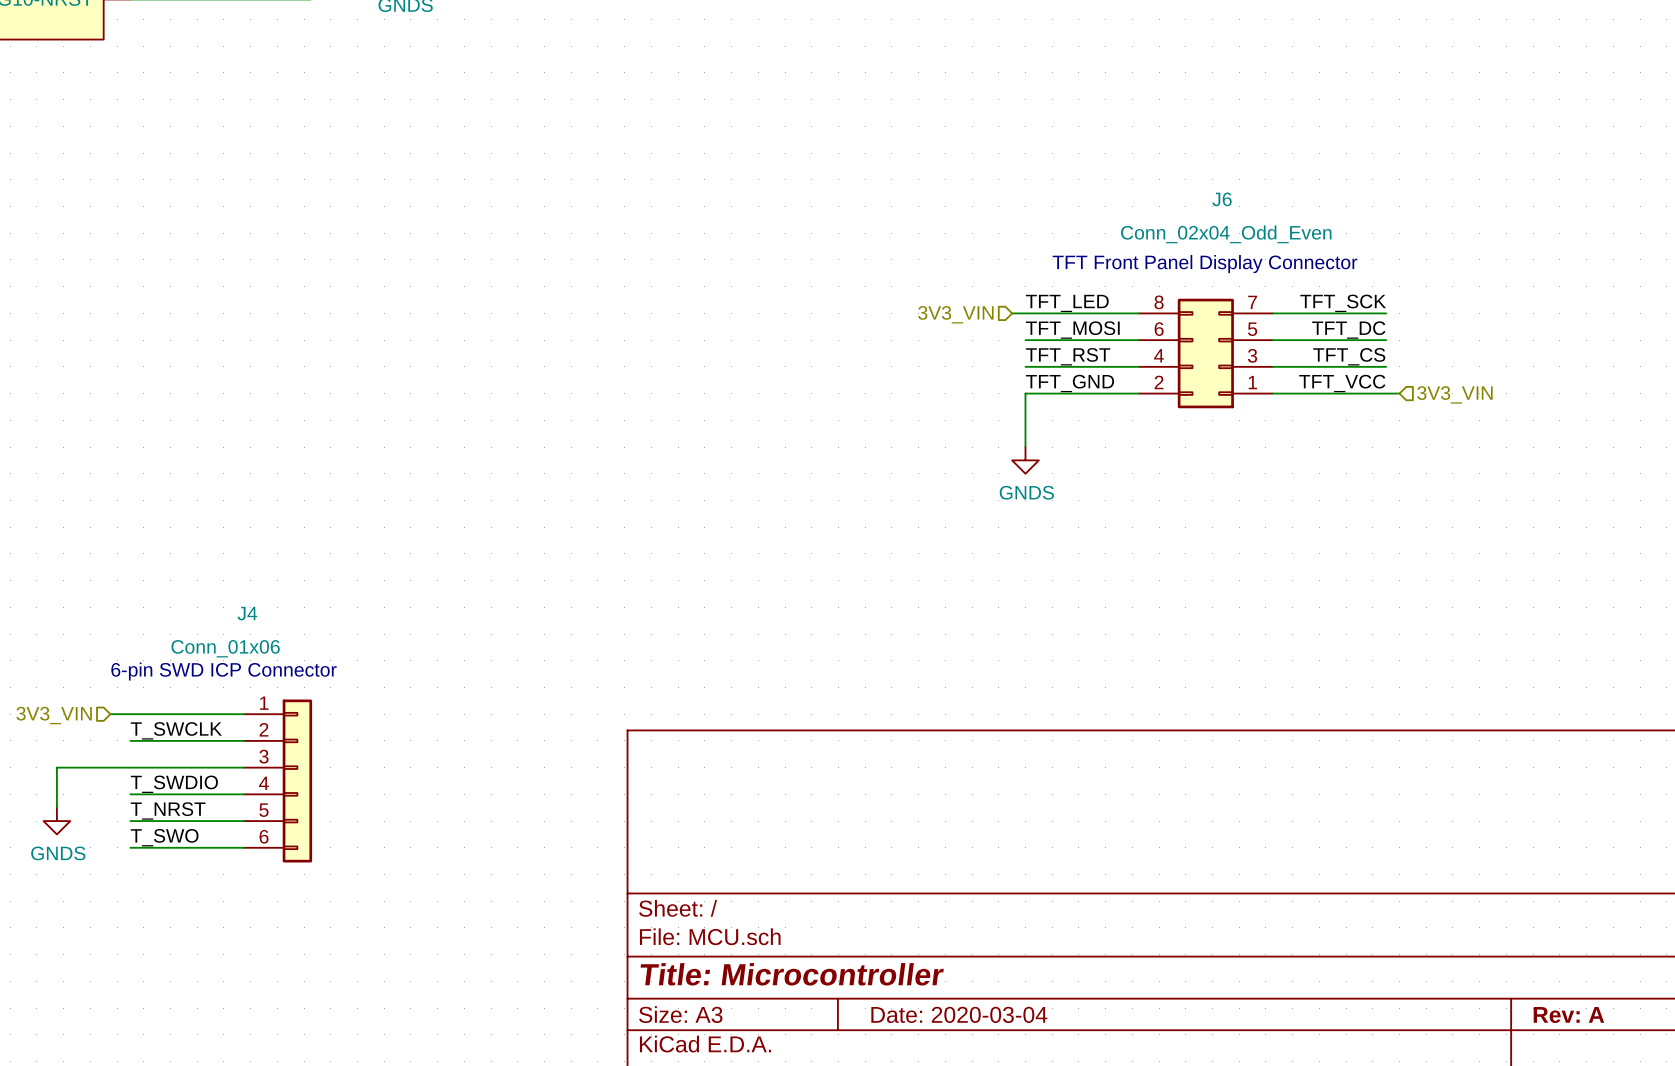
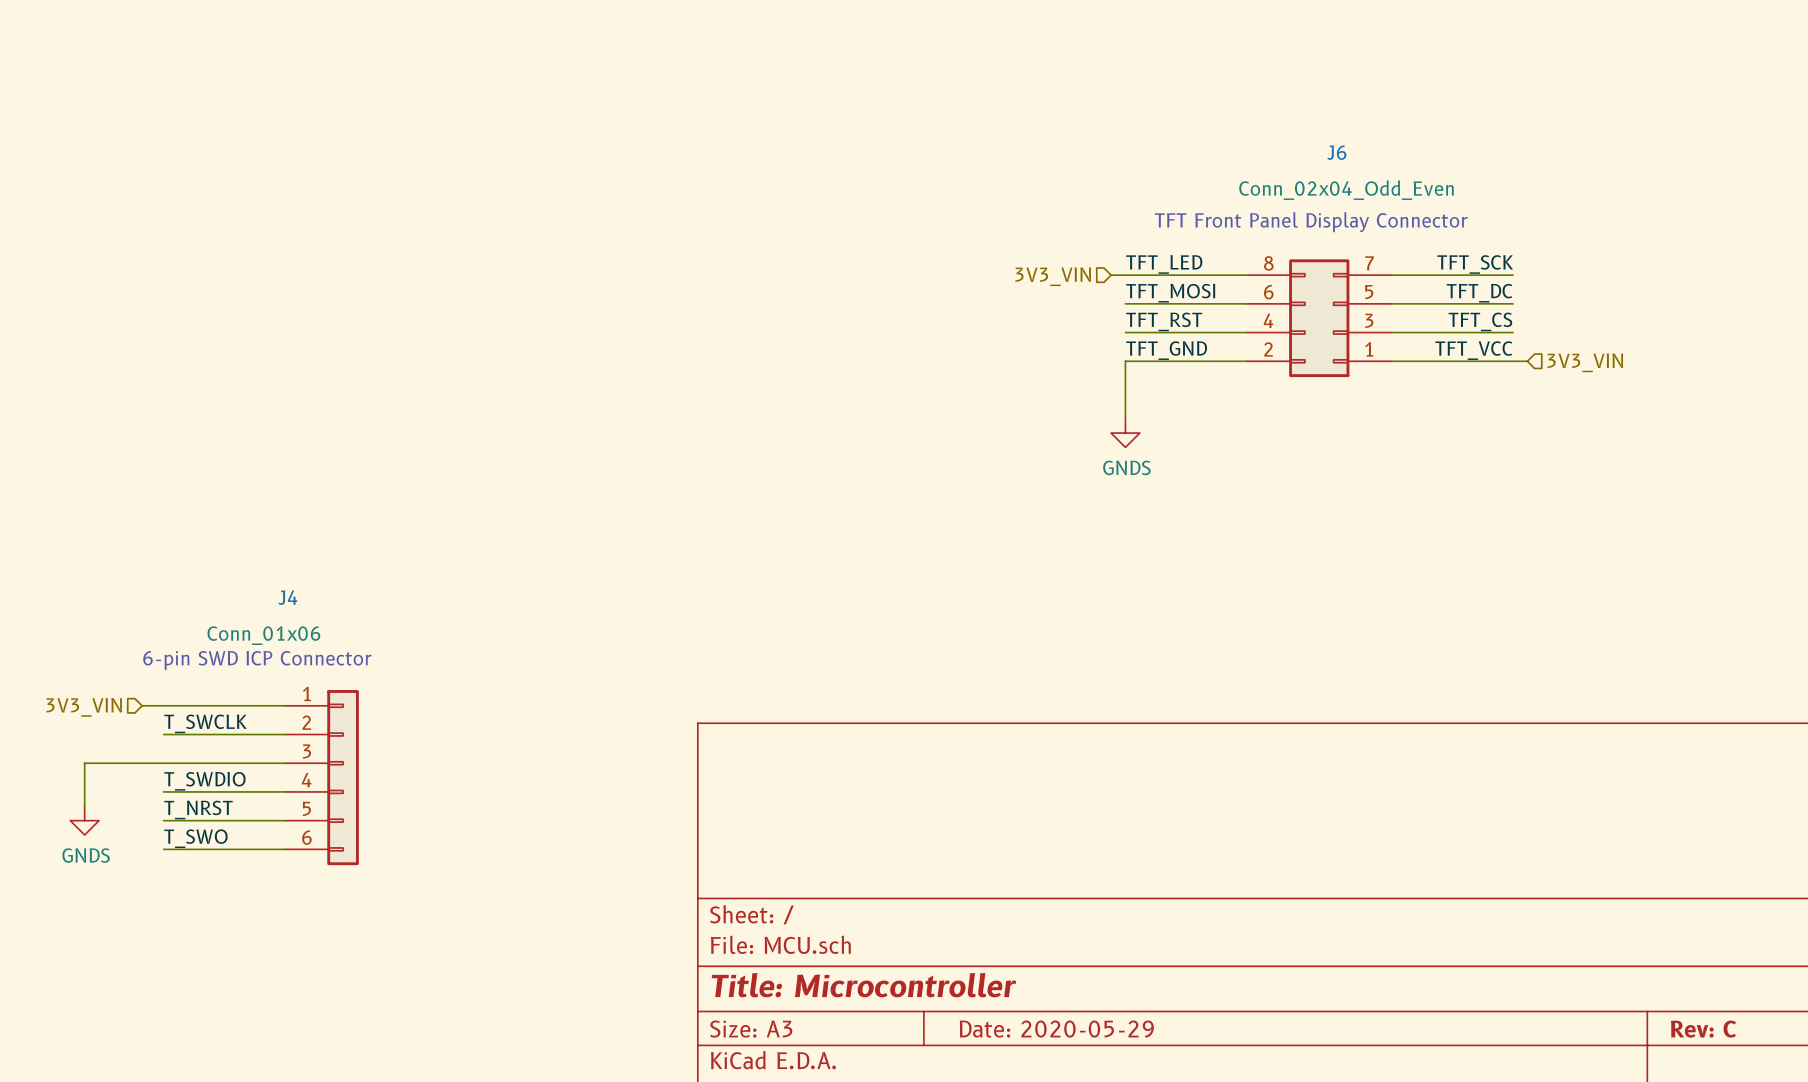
title block: Date: 2020-03-04 (959, 1014) -> Date: 2020-05-29 (1056, 1029)
title block: Rev: A (1568, 1015) -> Rev: C (1703, 1029)

